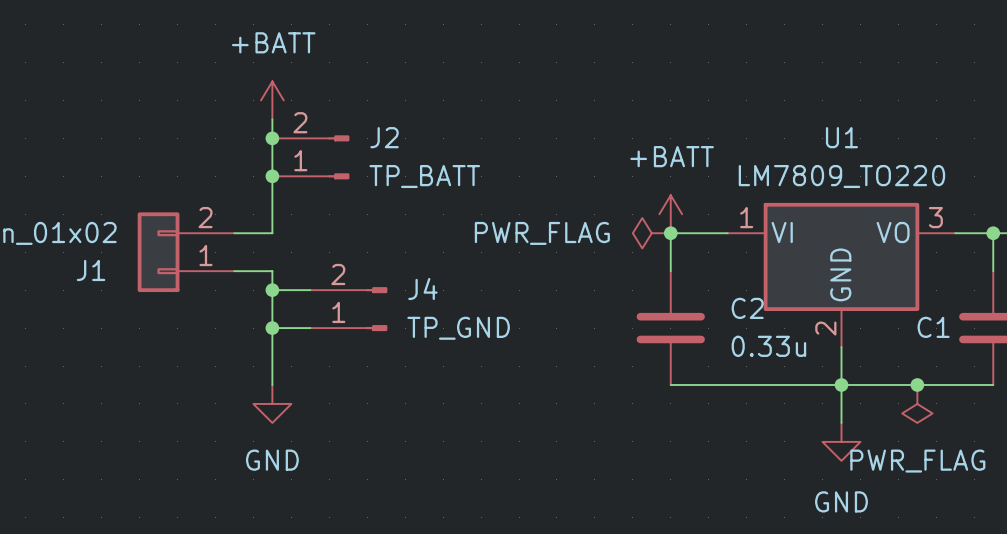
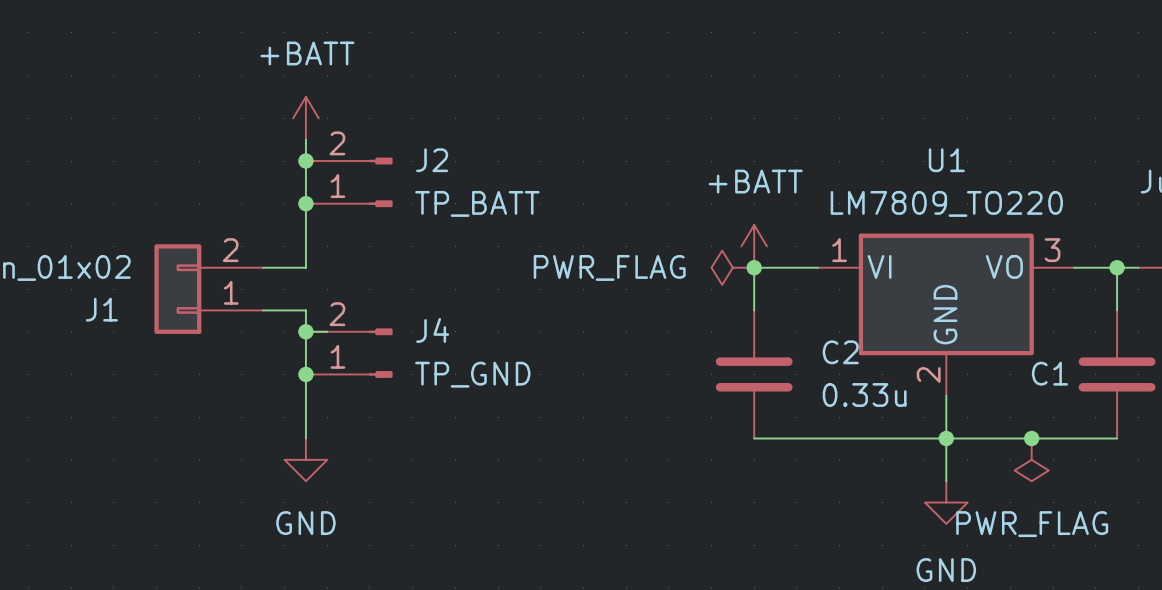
J4 position: (348, 309) -> (349, 353)

